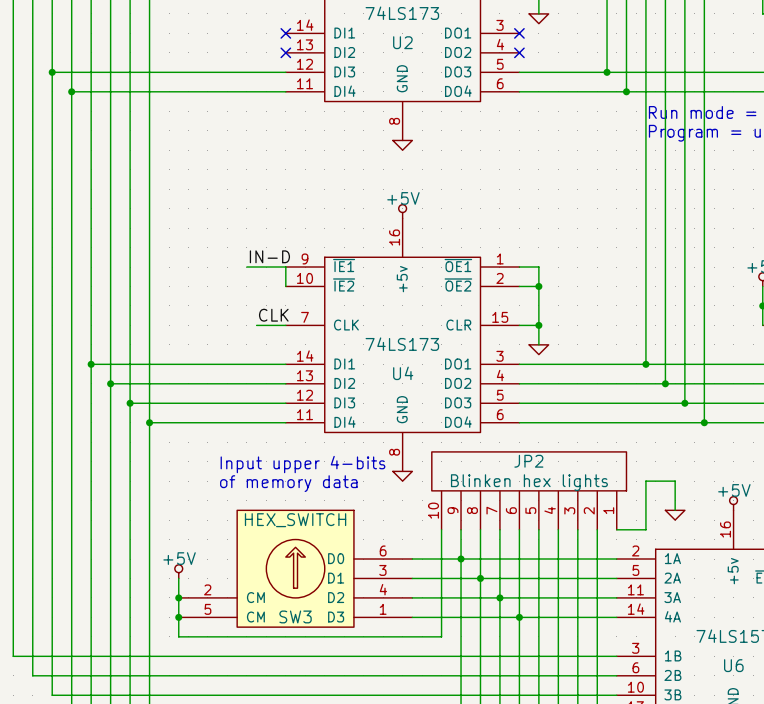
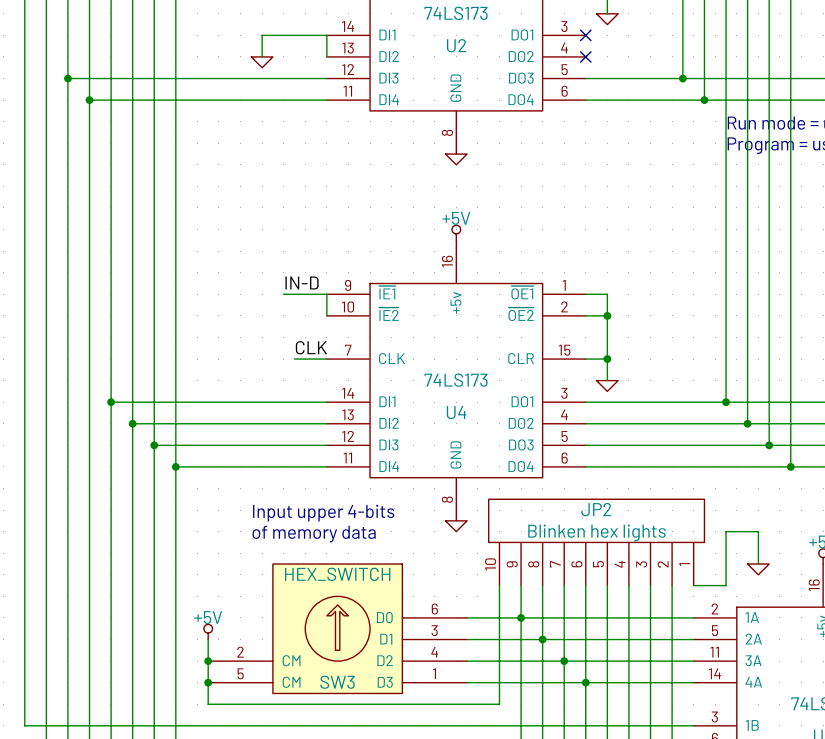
no-connect mark: (285, 33) -> none
wire: none -> (262, 56) (262, 35) (326, 35) (326, 56)
no-connect mark: (285, 52) -> none
power symbol: none -> (262, 62)

